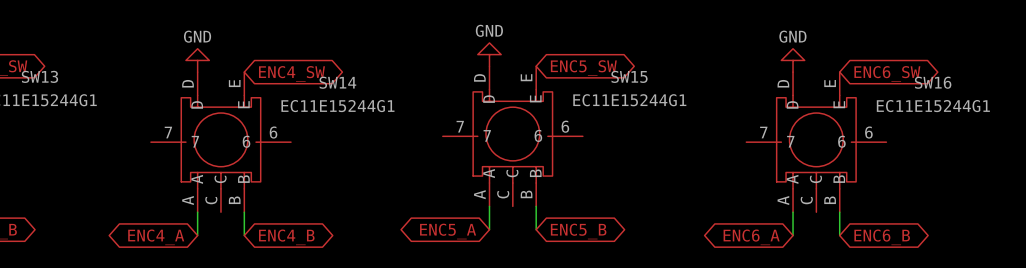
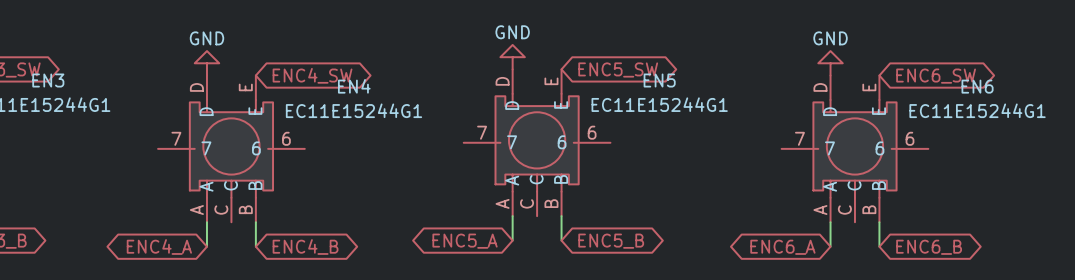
SW13 name: SW13 (39, 76) -> EN3 (48, 80)
SW15 name: SW15 (629, 76) -> EN5 (659, 80)
SW14 name: SW14 (337, 82) -> EN4 (354, 86)
SW16 name: SW16 (933, 82) -> EN6 (977, 86)

